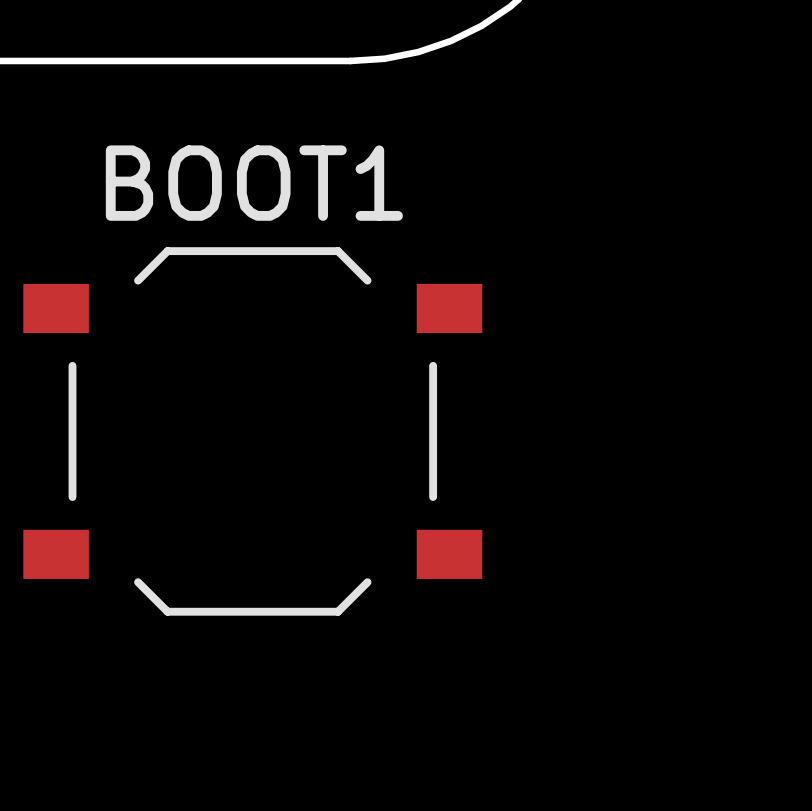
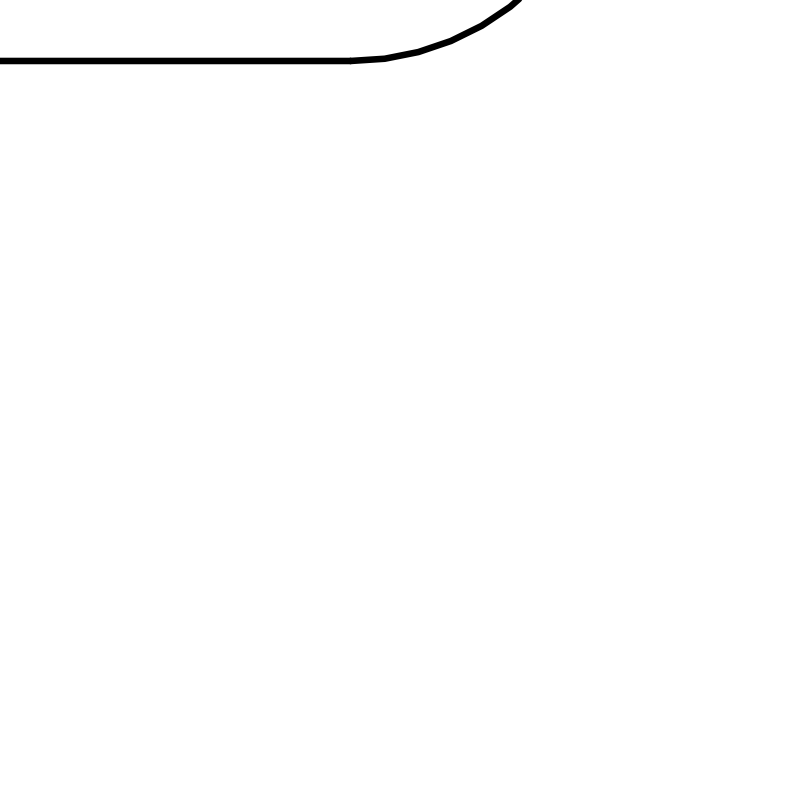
BOOT1: (252, 431) -> none

